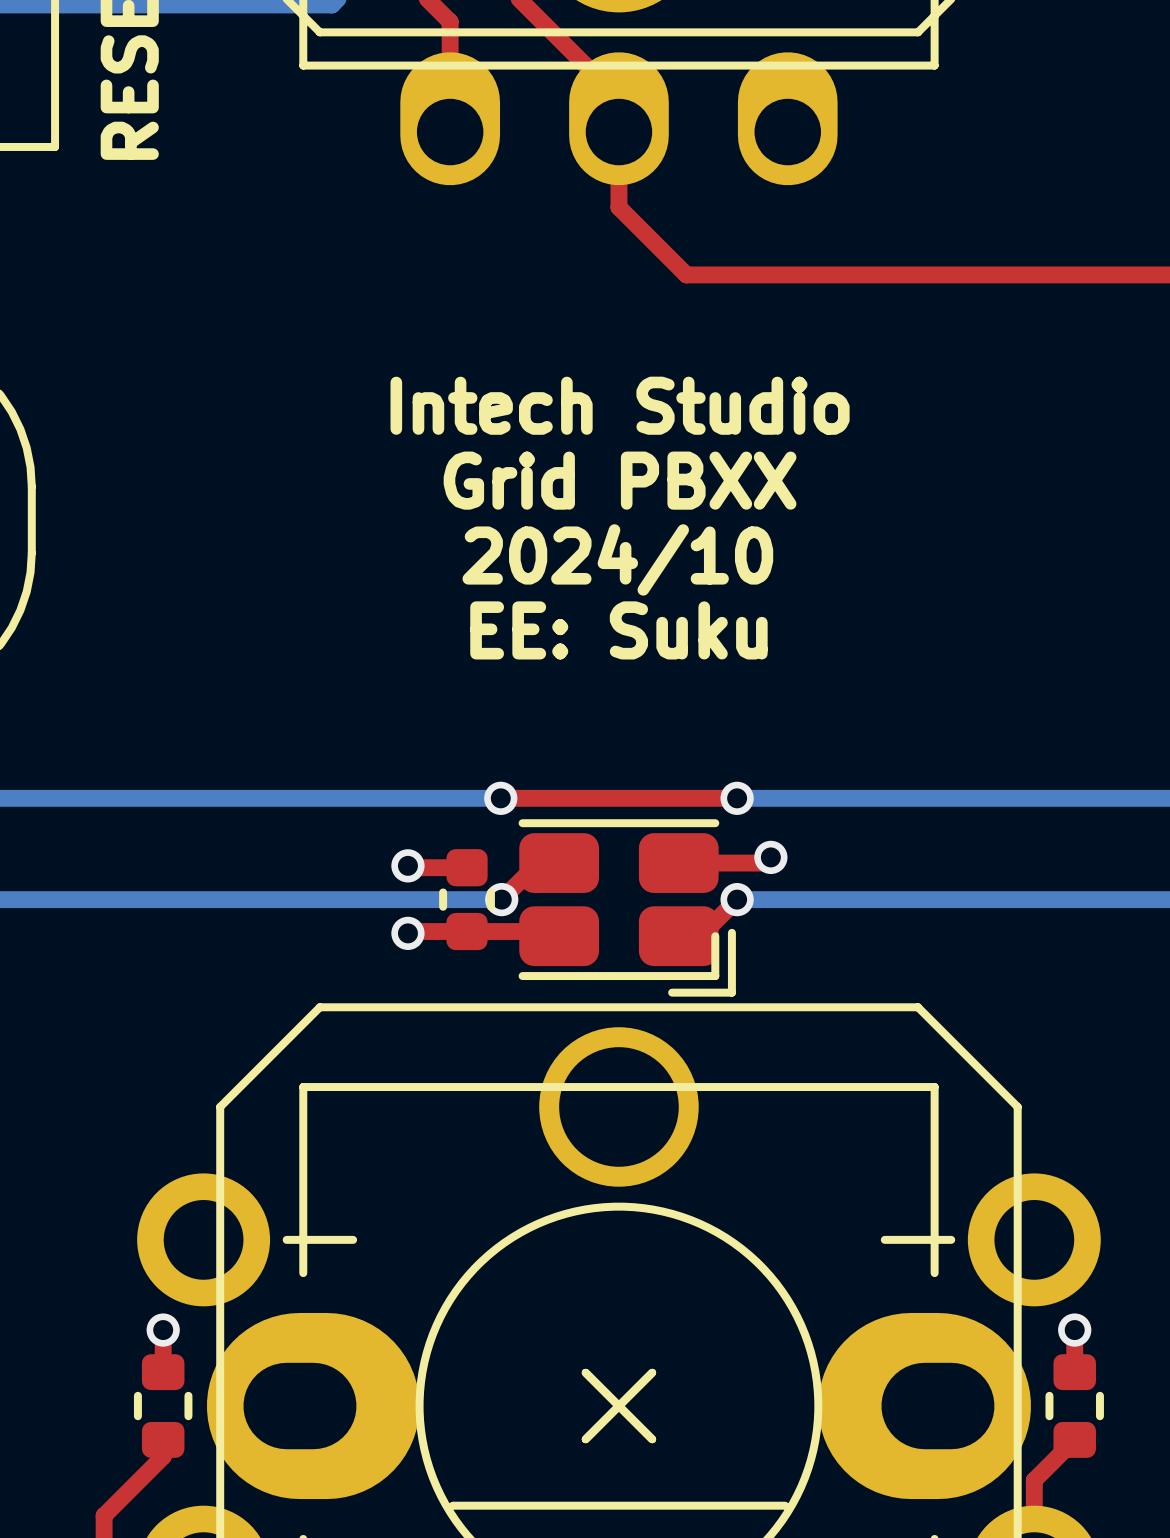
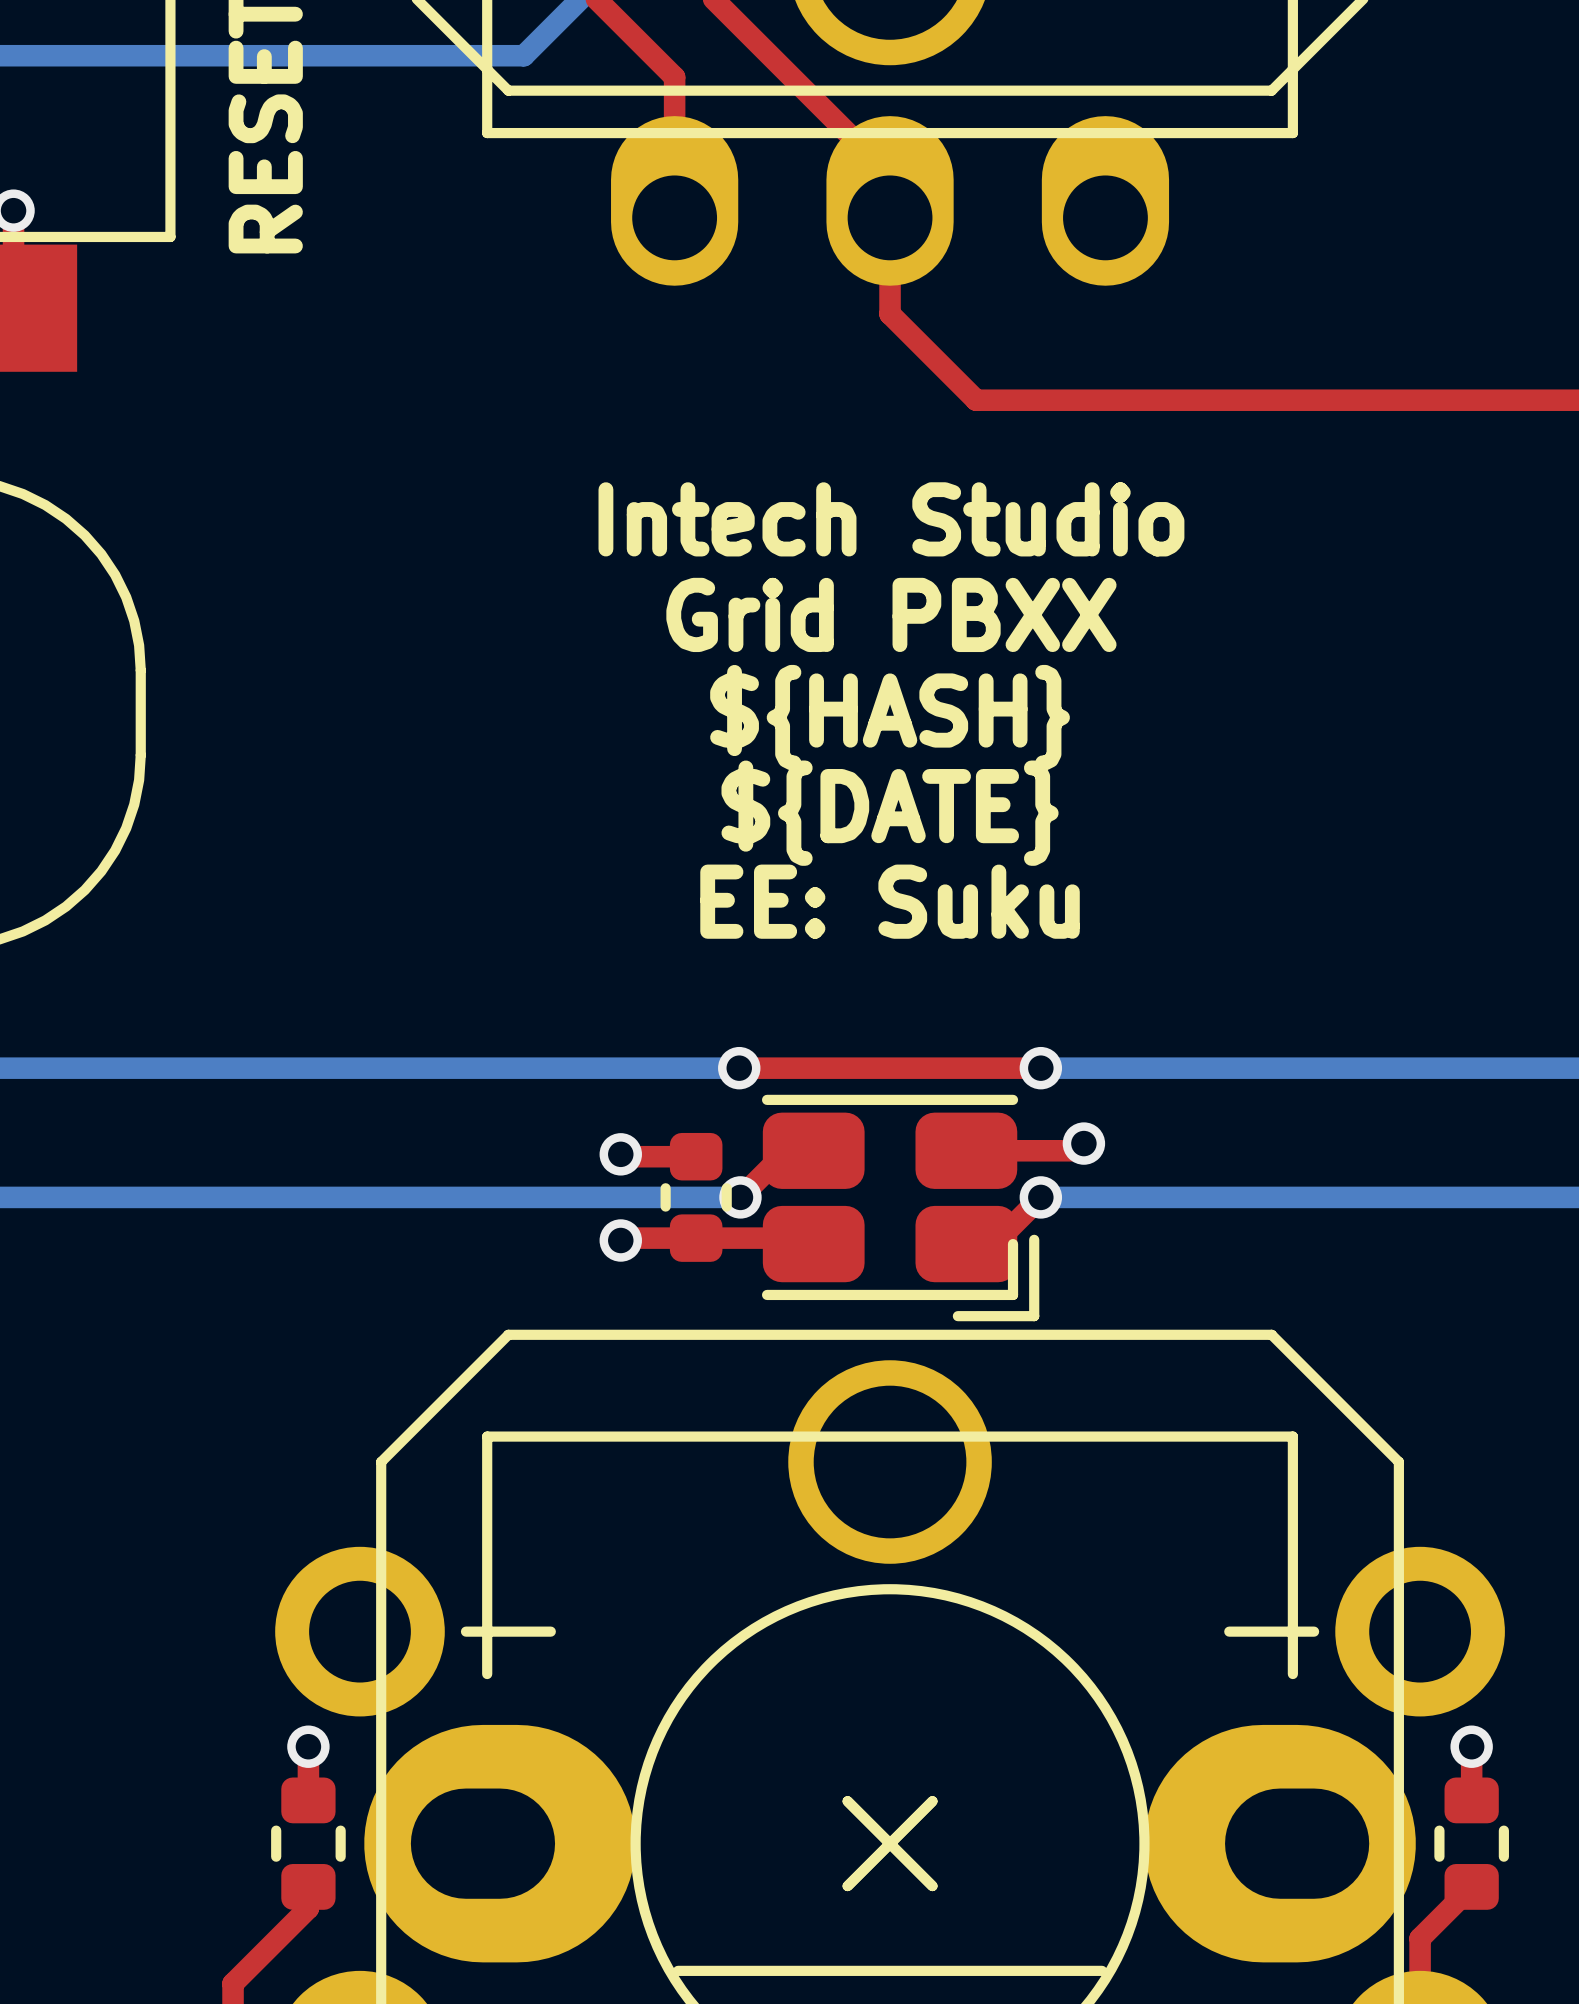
text position: Intech Studio (620, 405) -> Intech Studio (891, 519)
text position: Grid PBXX (620, 480) -> Grid PBXX (891, 614)
text: none -> ${HASH} (890, 717)
text: 2024/10 (617, 559) -> none
text: none -> ${DATE} (890, 813)
text position: EE: Suku (618, 630) -> EE: Suku (890, 901)

